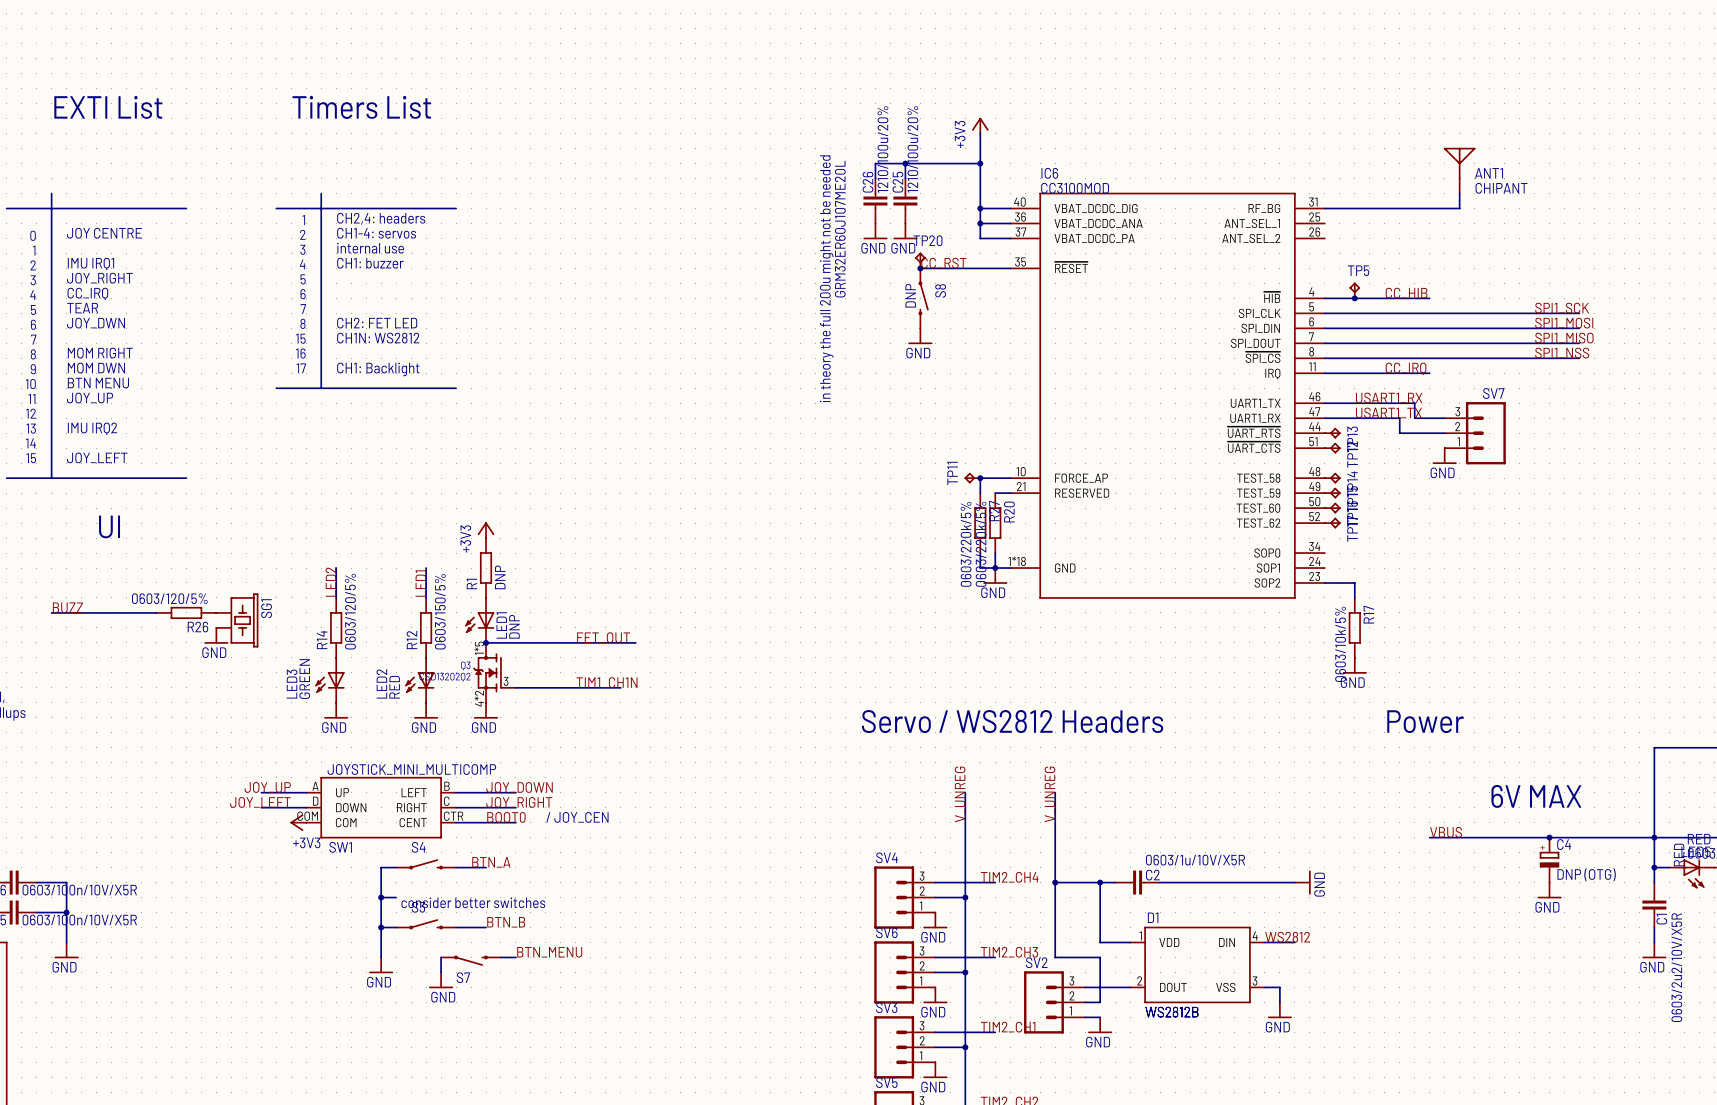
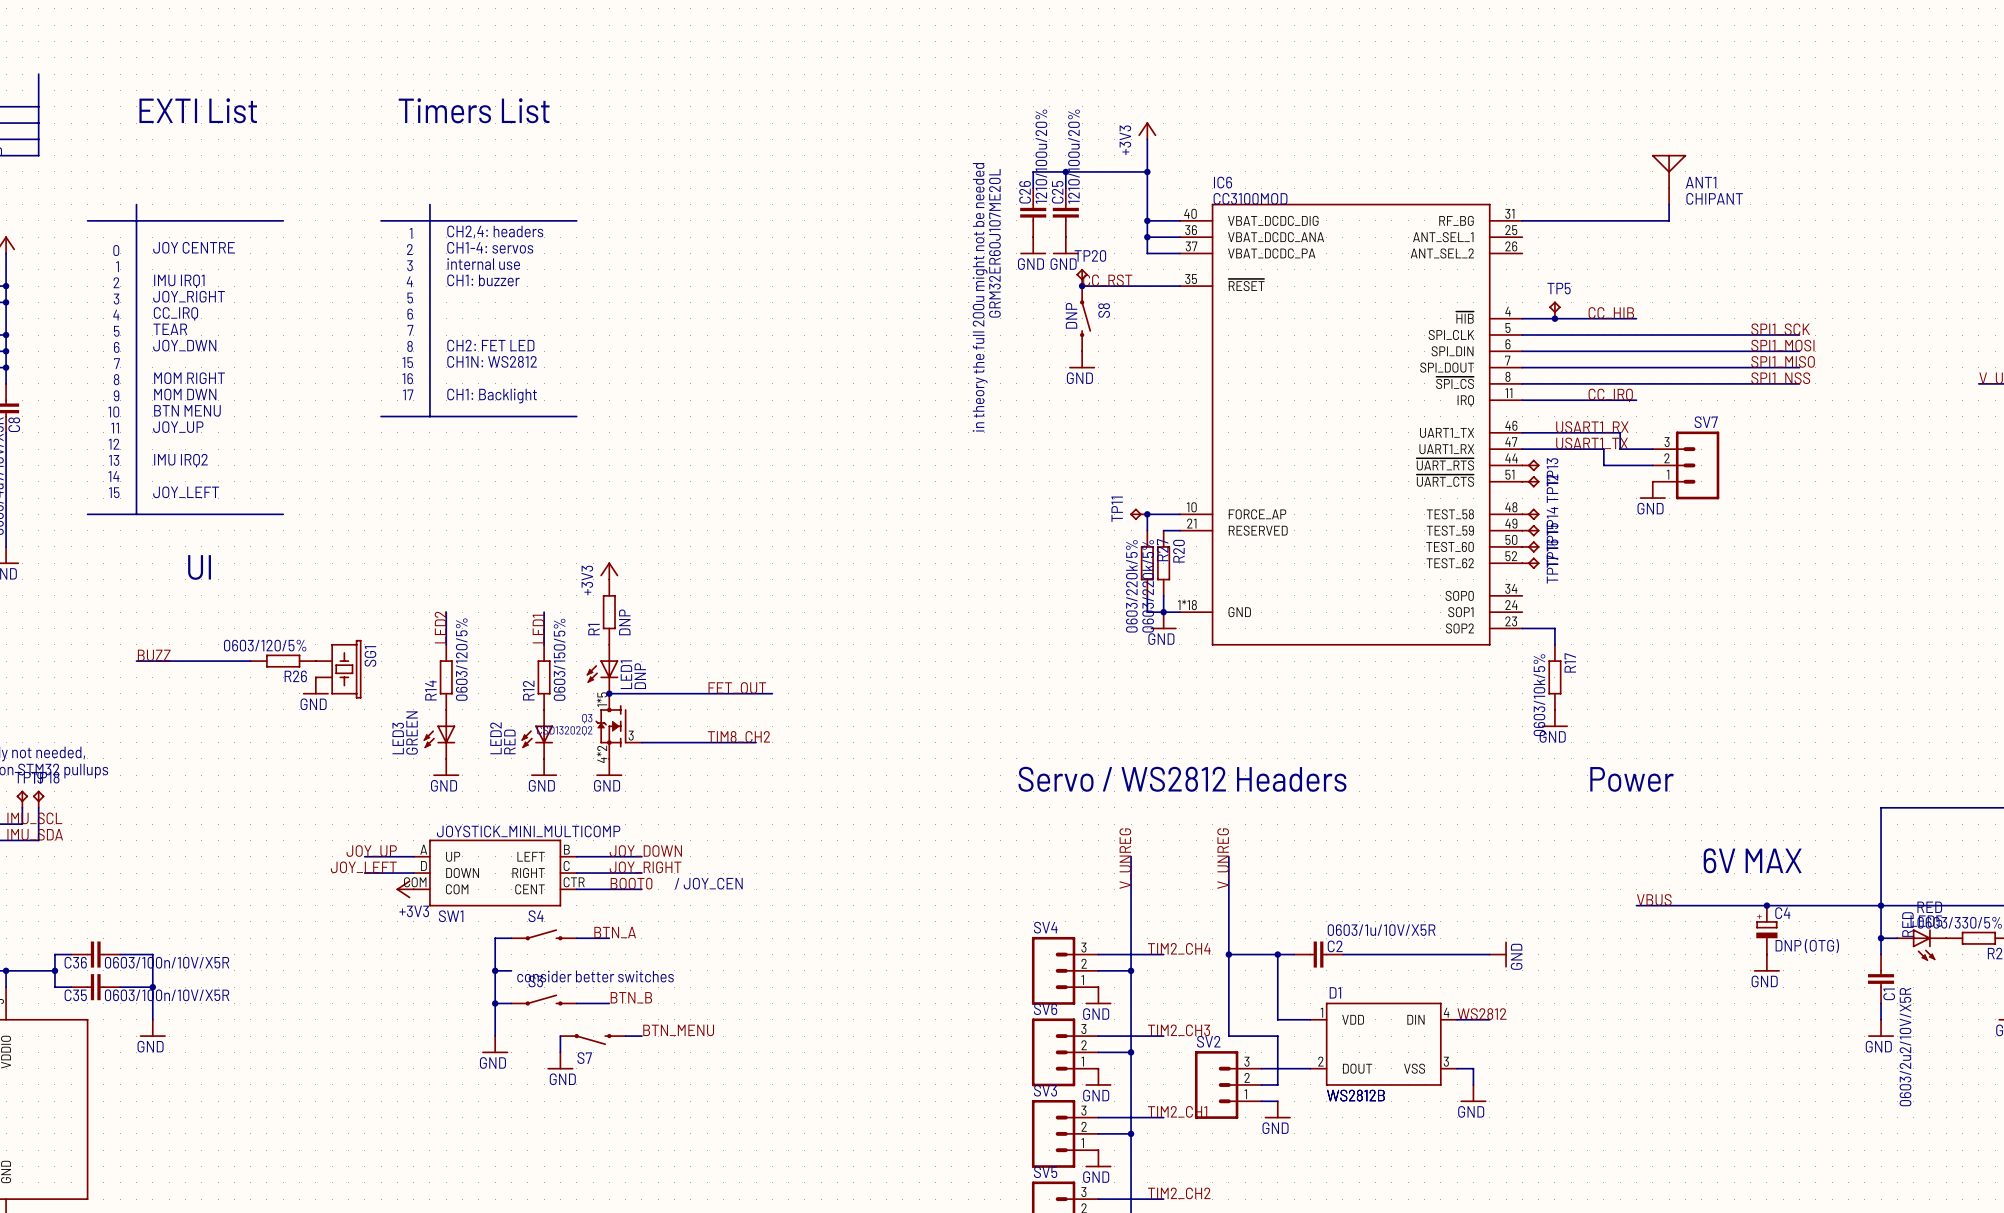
label: TIM1_CH1N (606, 682) -> TIM8_CH2 (738, 736)

